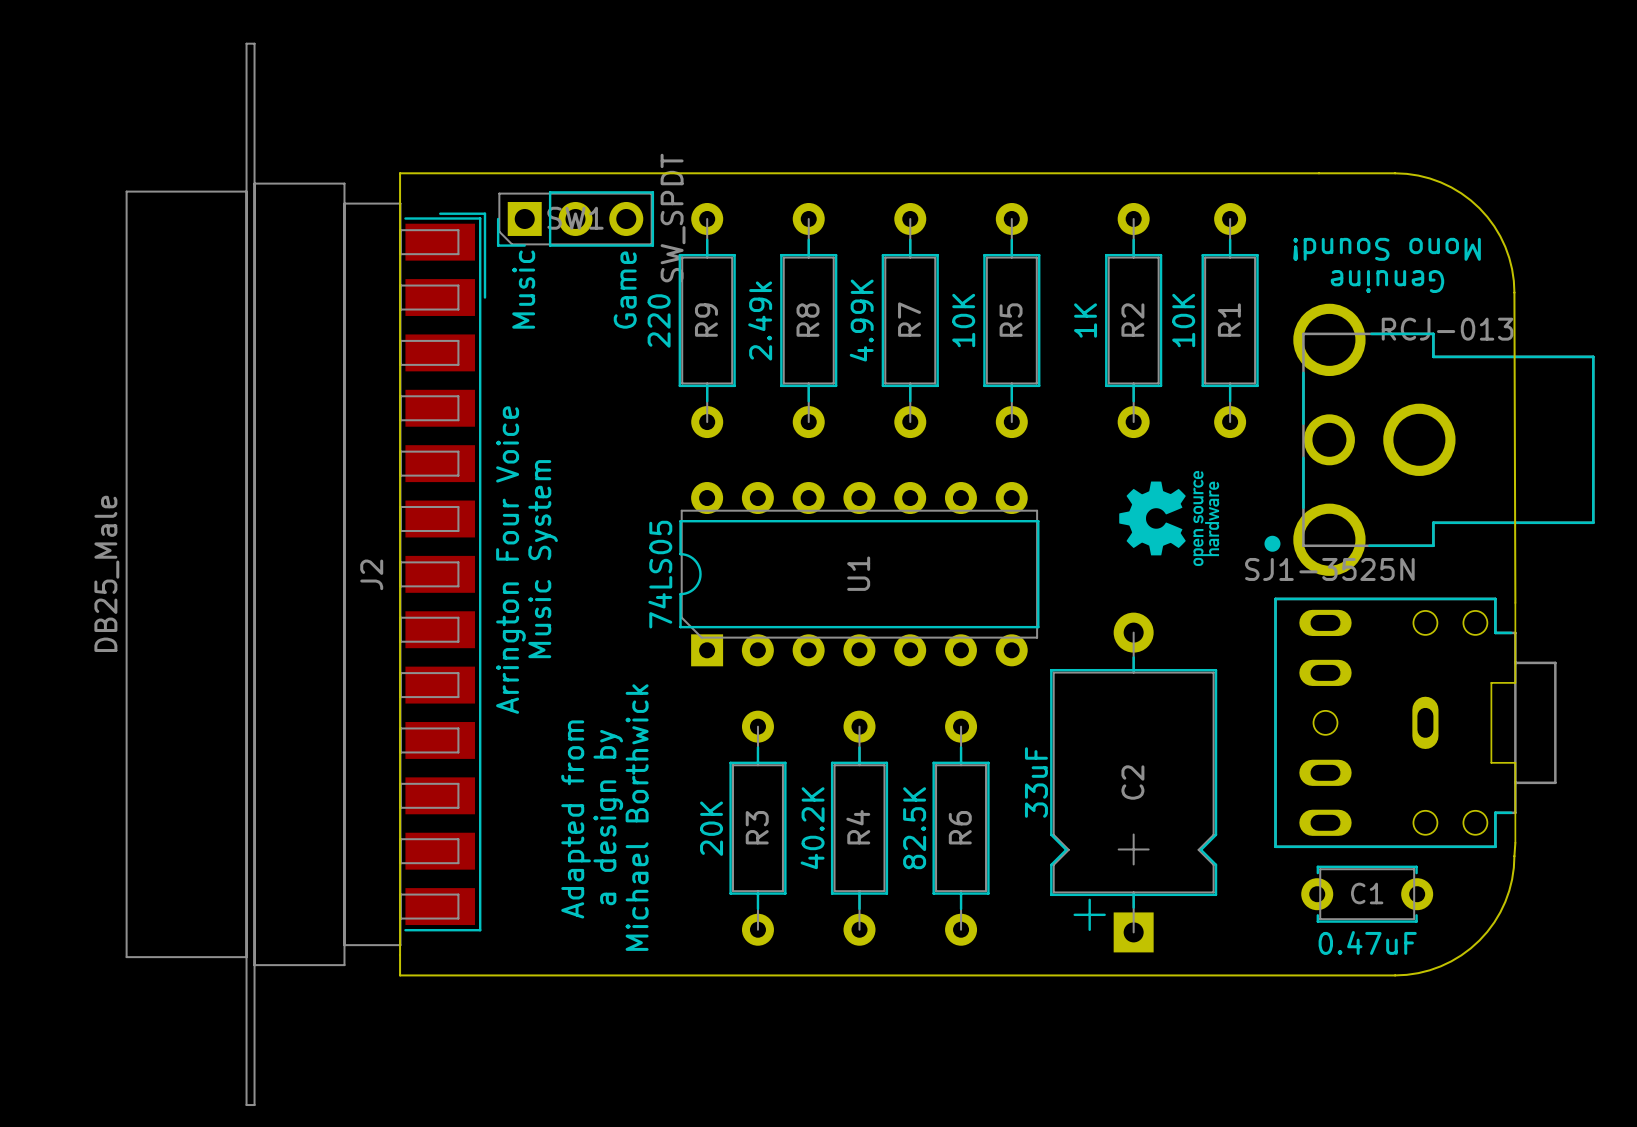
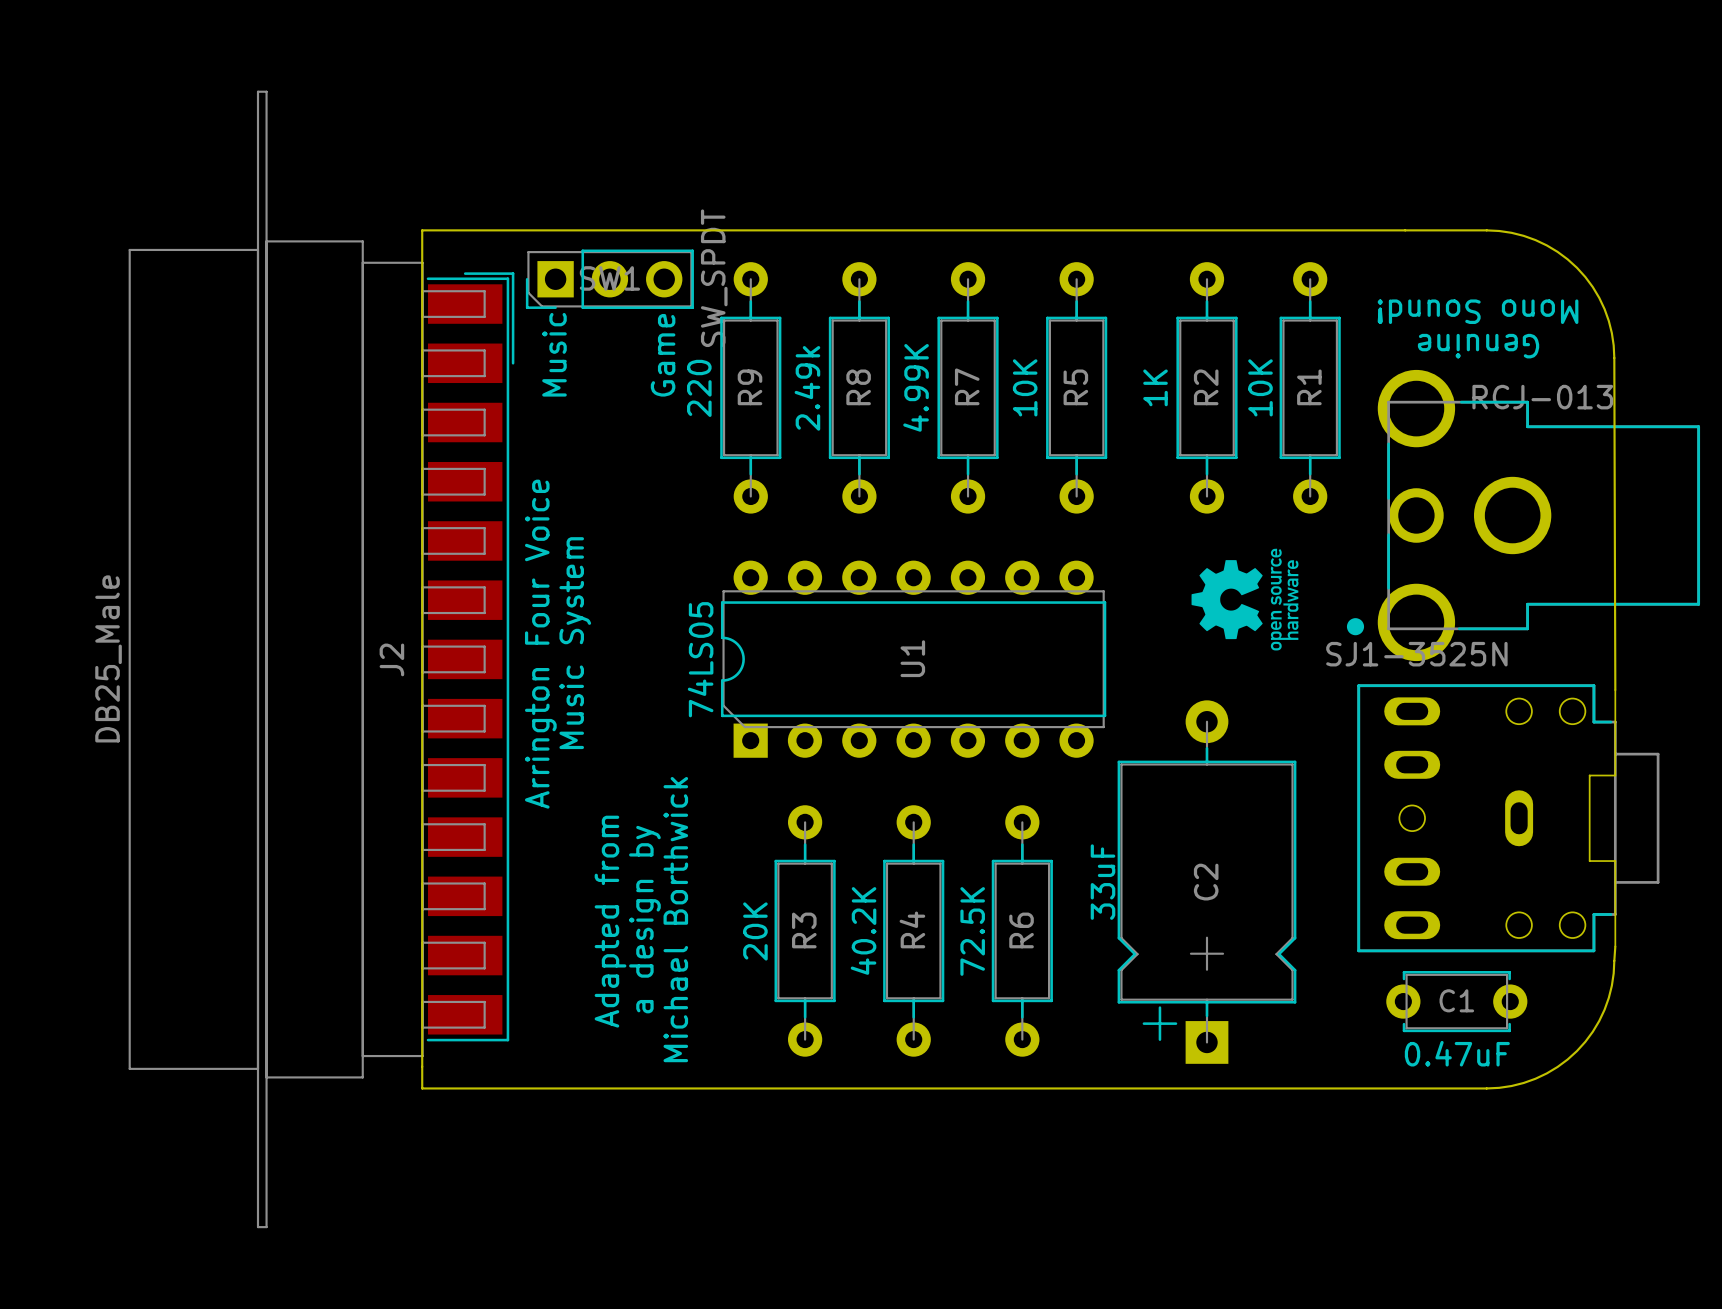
R6 value: 82.5K (914, 828) -> 72.5K (972, 931)

